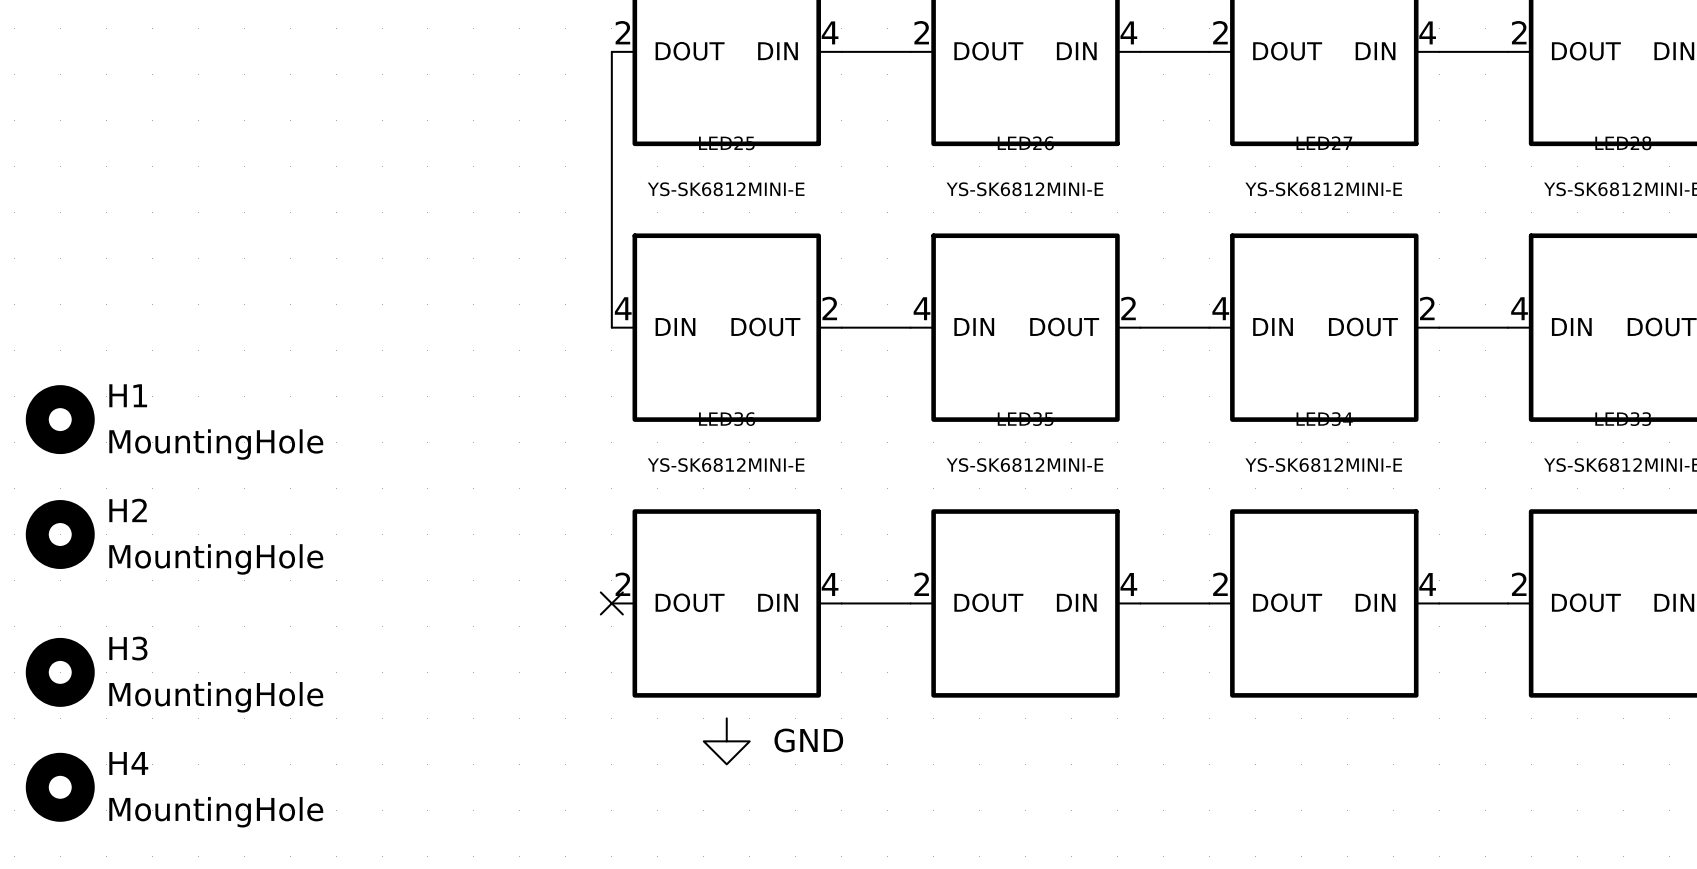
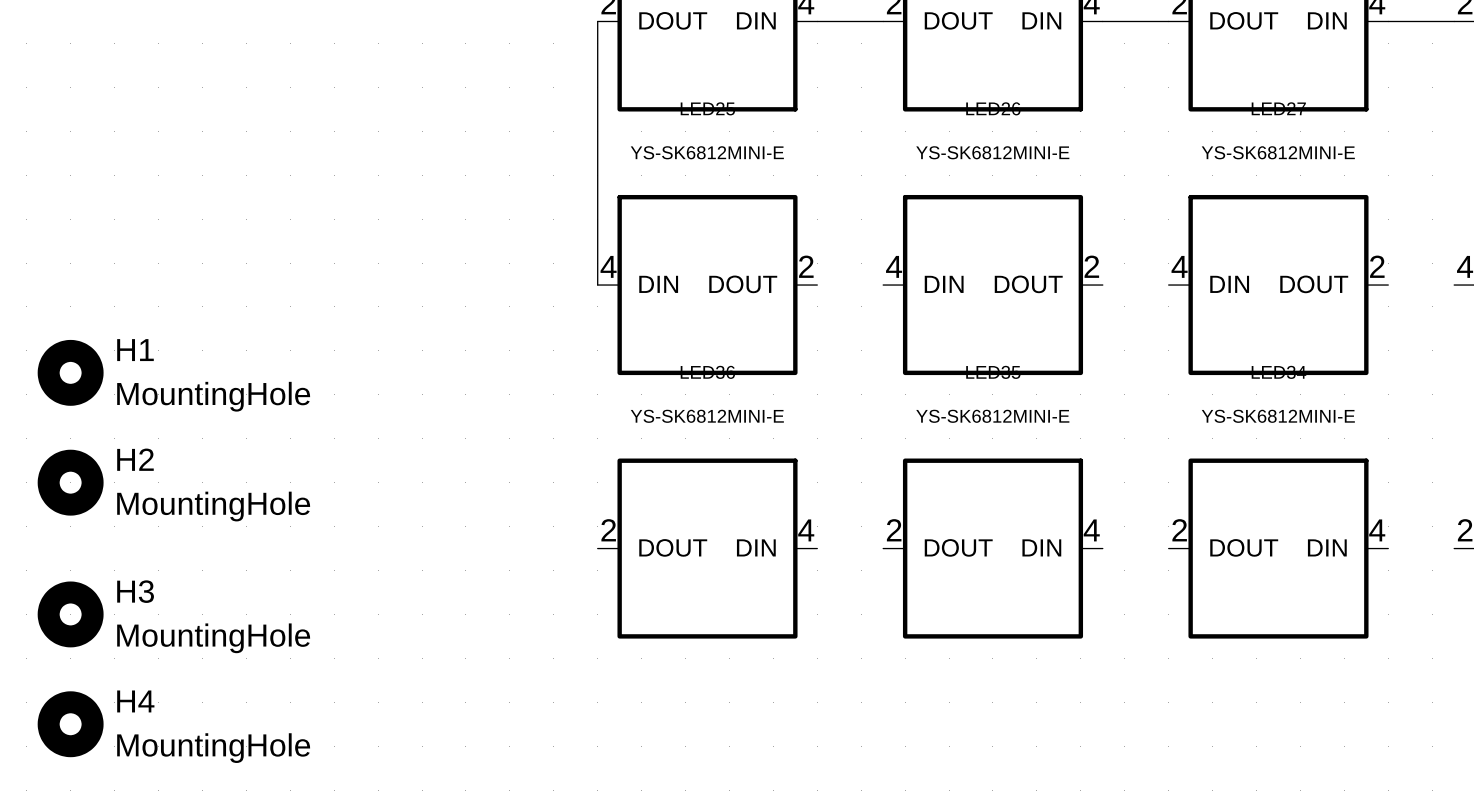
wire: (841, 327) (910, 327) -> none
wire: (1140, 327) (1209, 327) -> none
wire: (1439, 327) (1508, 327) -> none
no-connect mark: (611, 603) -> none
wire: (841, 603) (910, 603) -> none
wire: (1140, 603) (1209, 603) -> none
wire: (1439, 603) (1508, 603) -> none
power symbol: GND (726, 741) -> none

